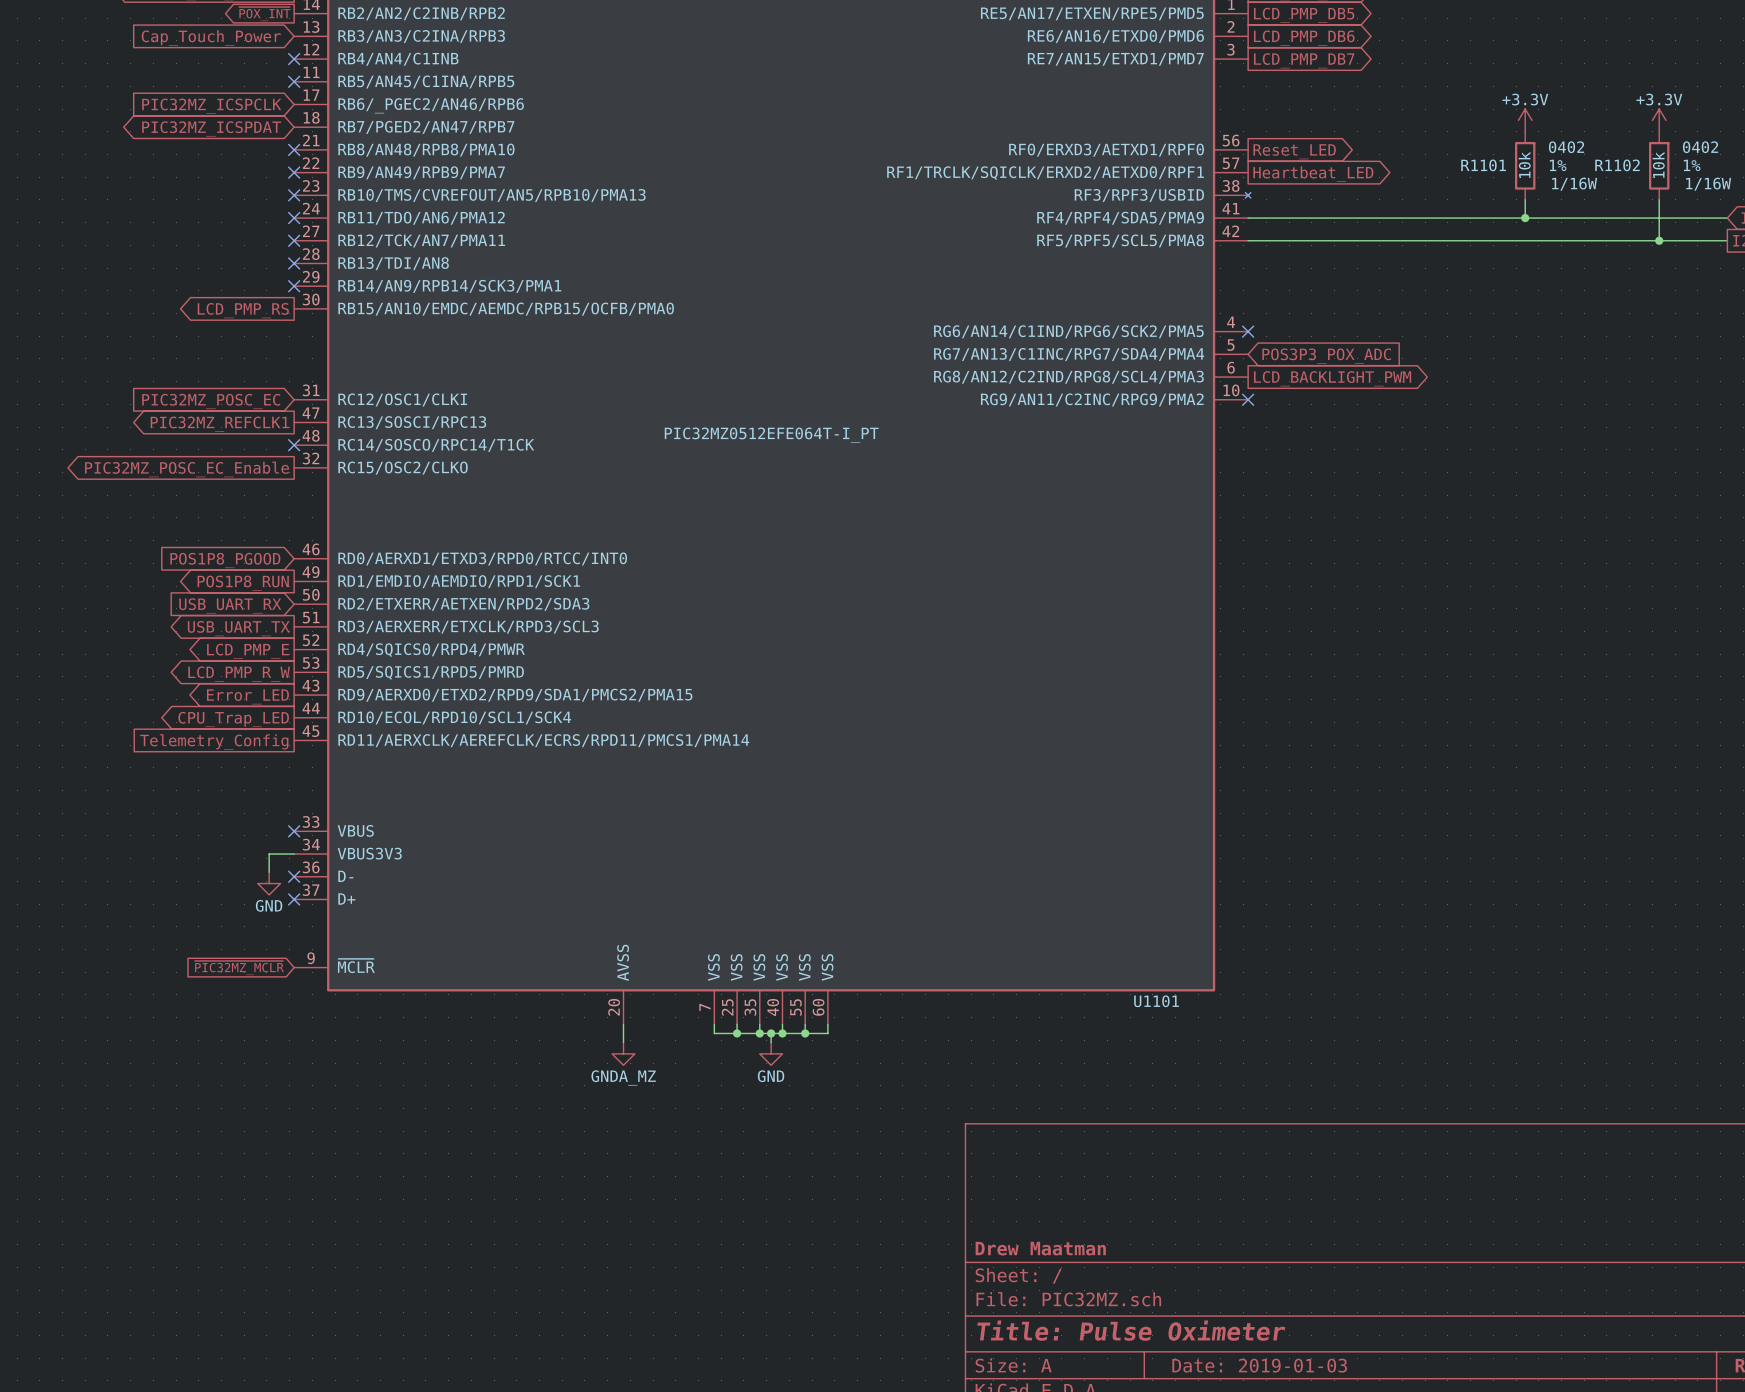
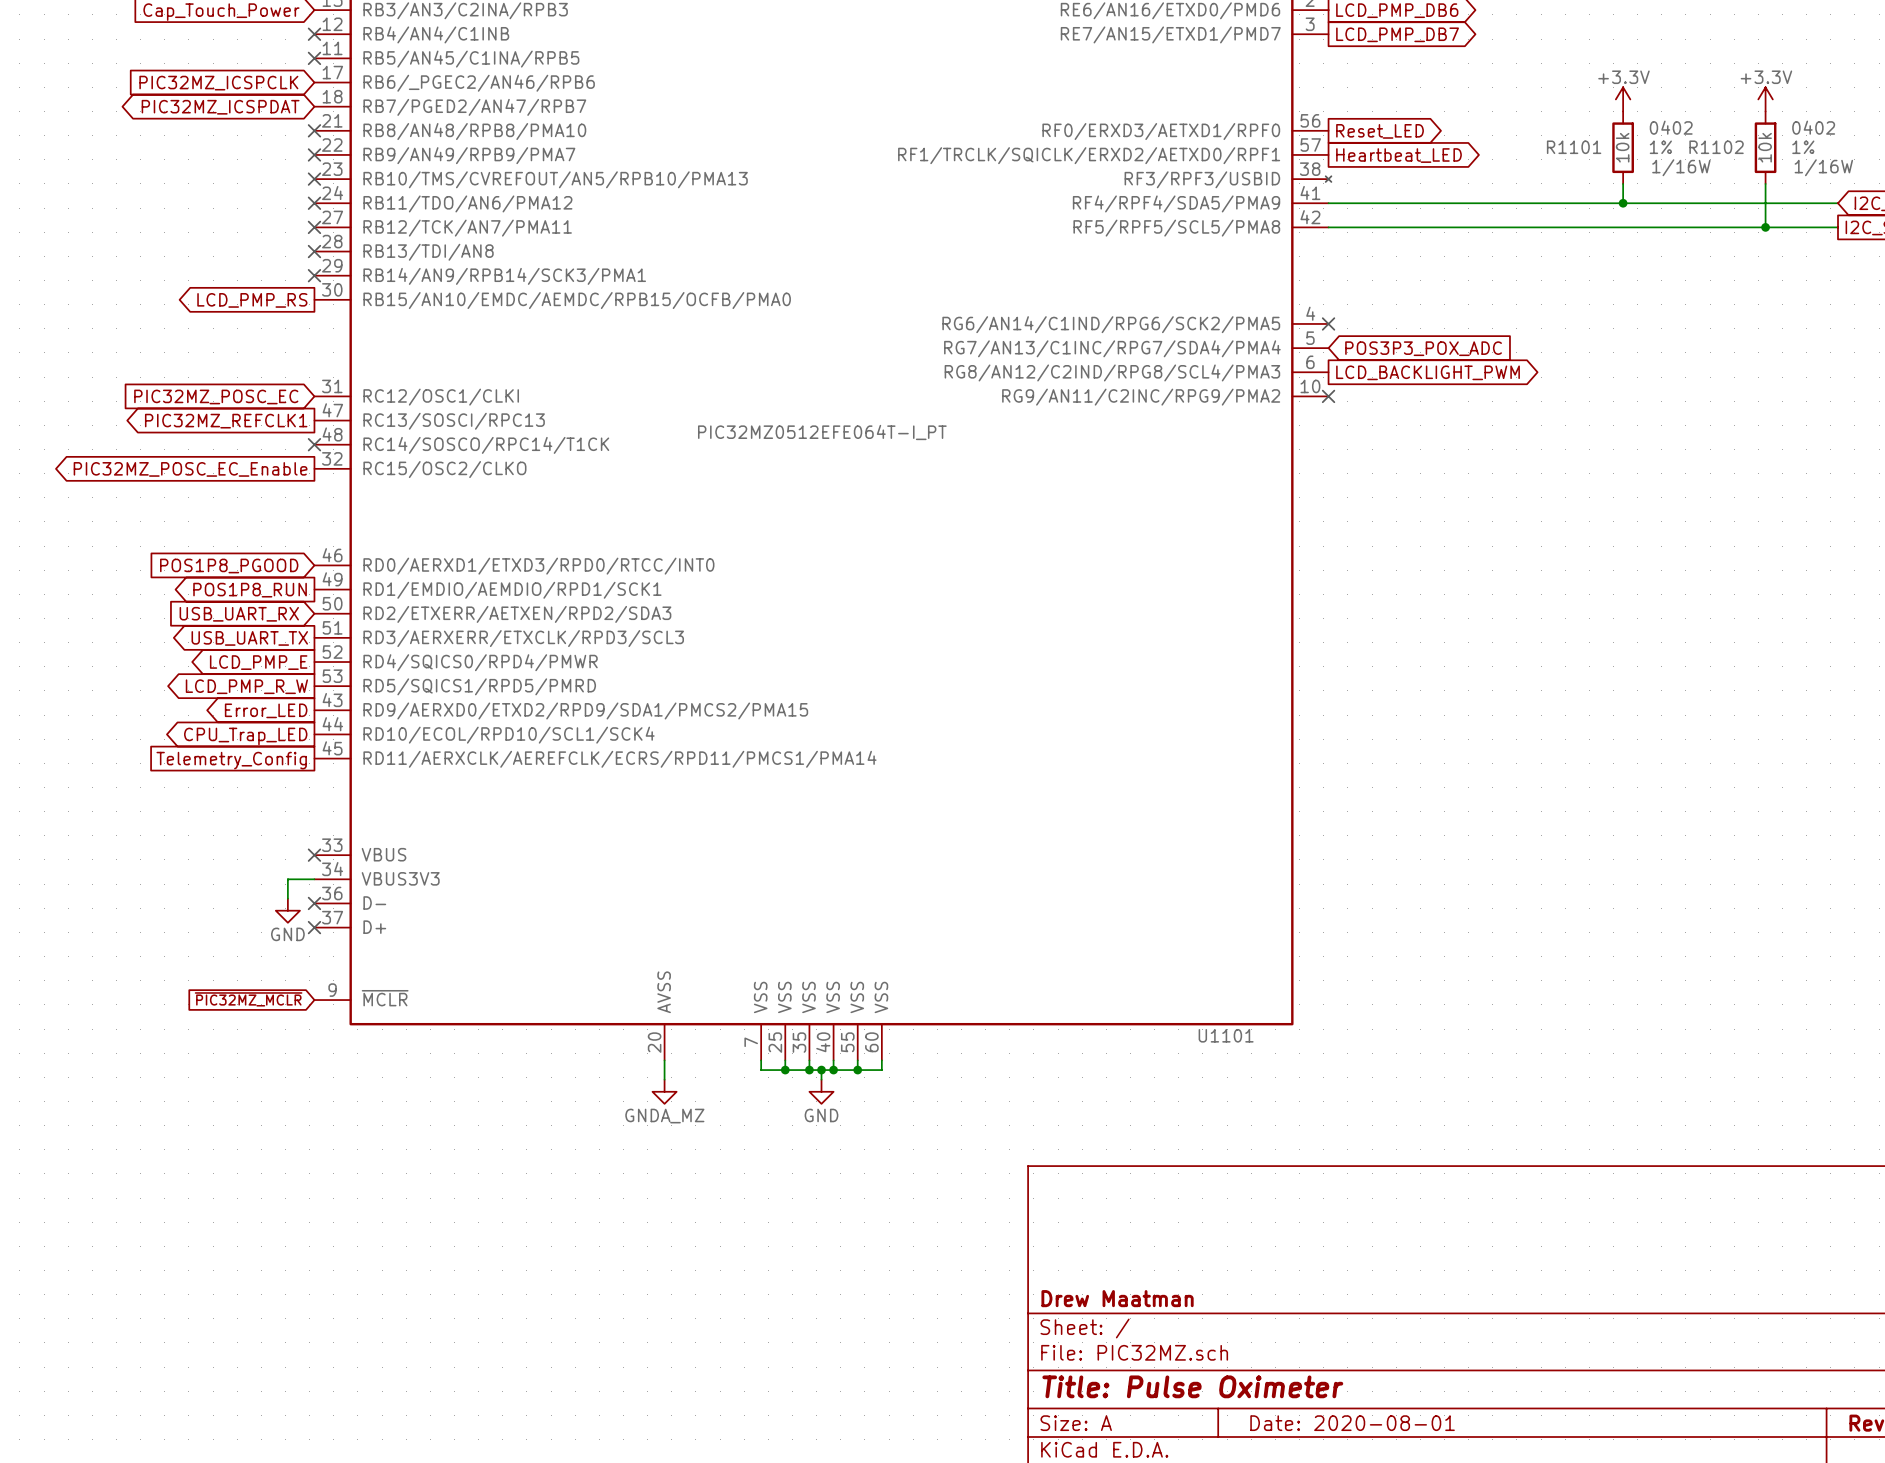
title block: Date: 2019-01-03 (1259, 1365) -> Date: 2020-08-01 (1352, 1423)

